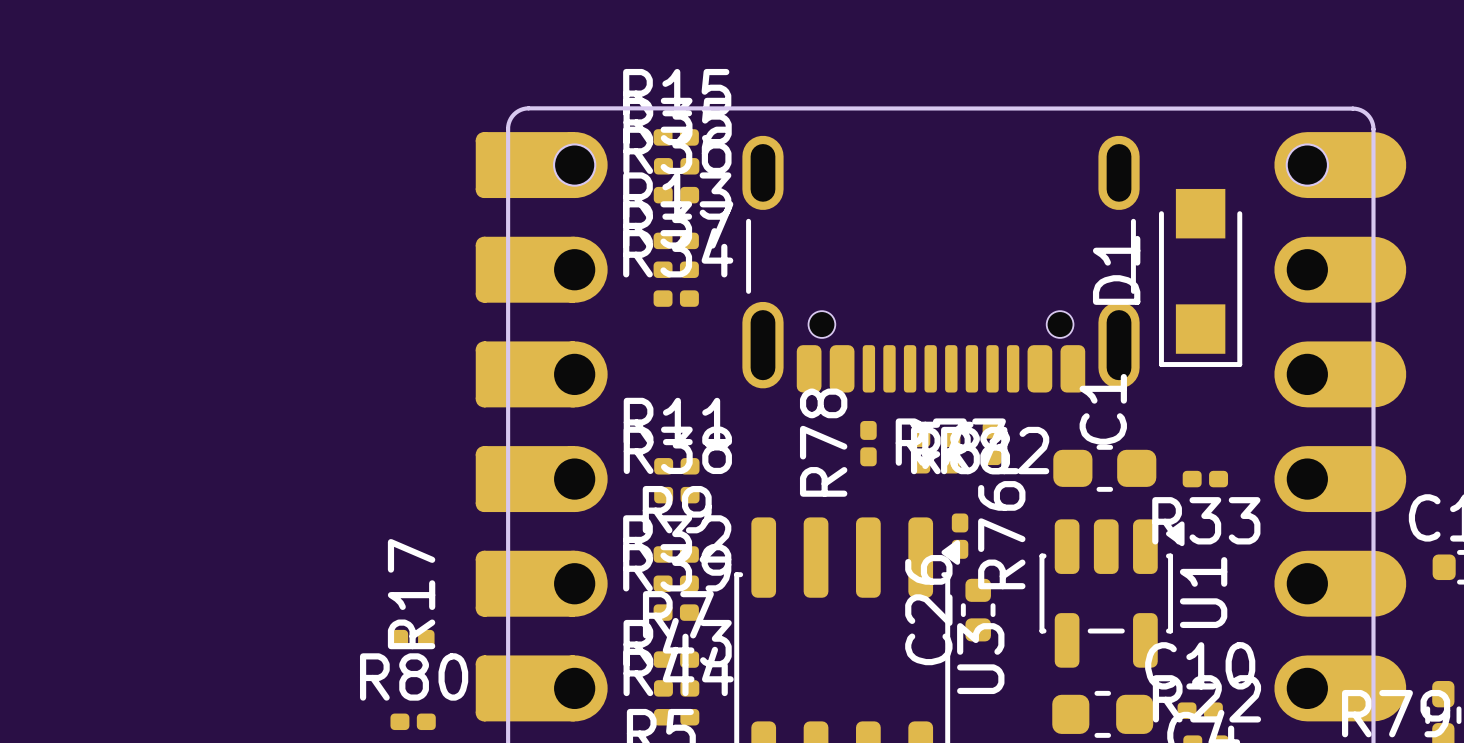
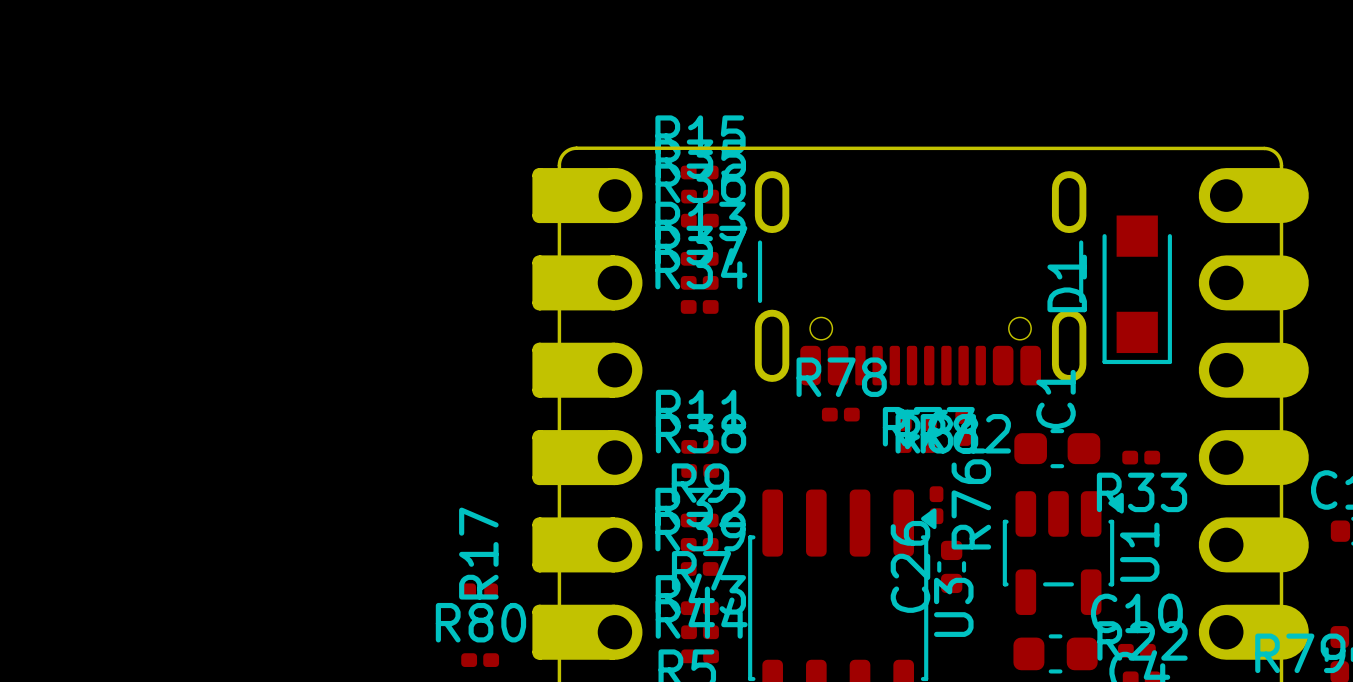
R78 rotation: 0° (868, 443) -> 90° clockwise (840, 414)
R78 position: (868, 443) -> (840, 414)

